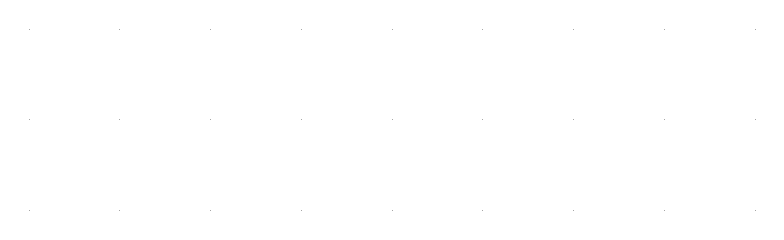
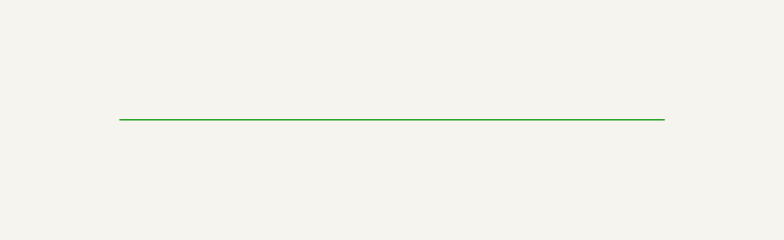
wire: none -> (119, 119) (664, 119)

